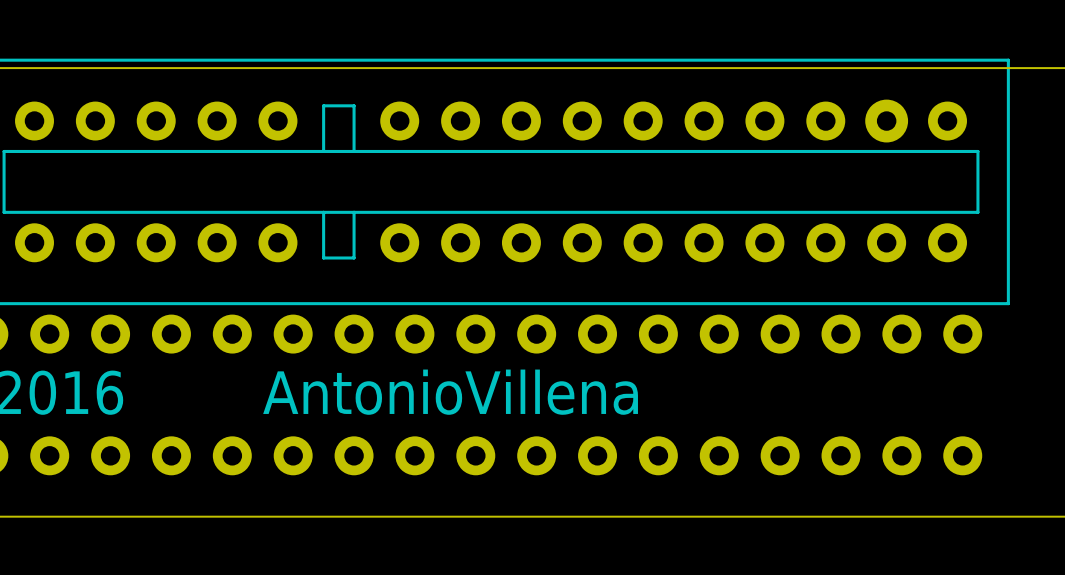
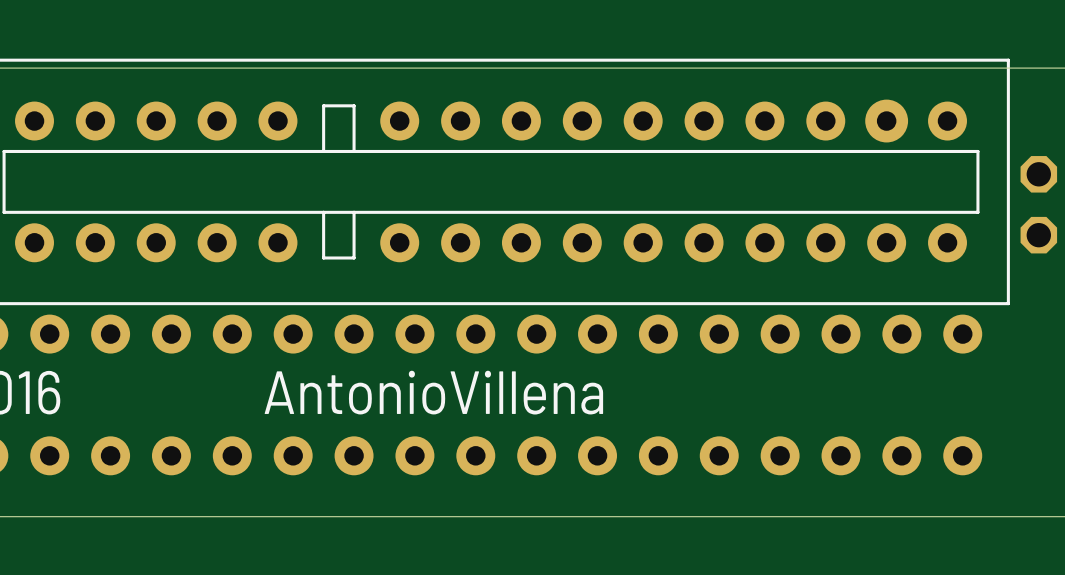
part: none -> (1038, 174)
part: none -> (1038, 235)

